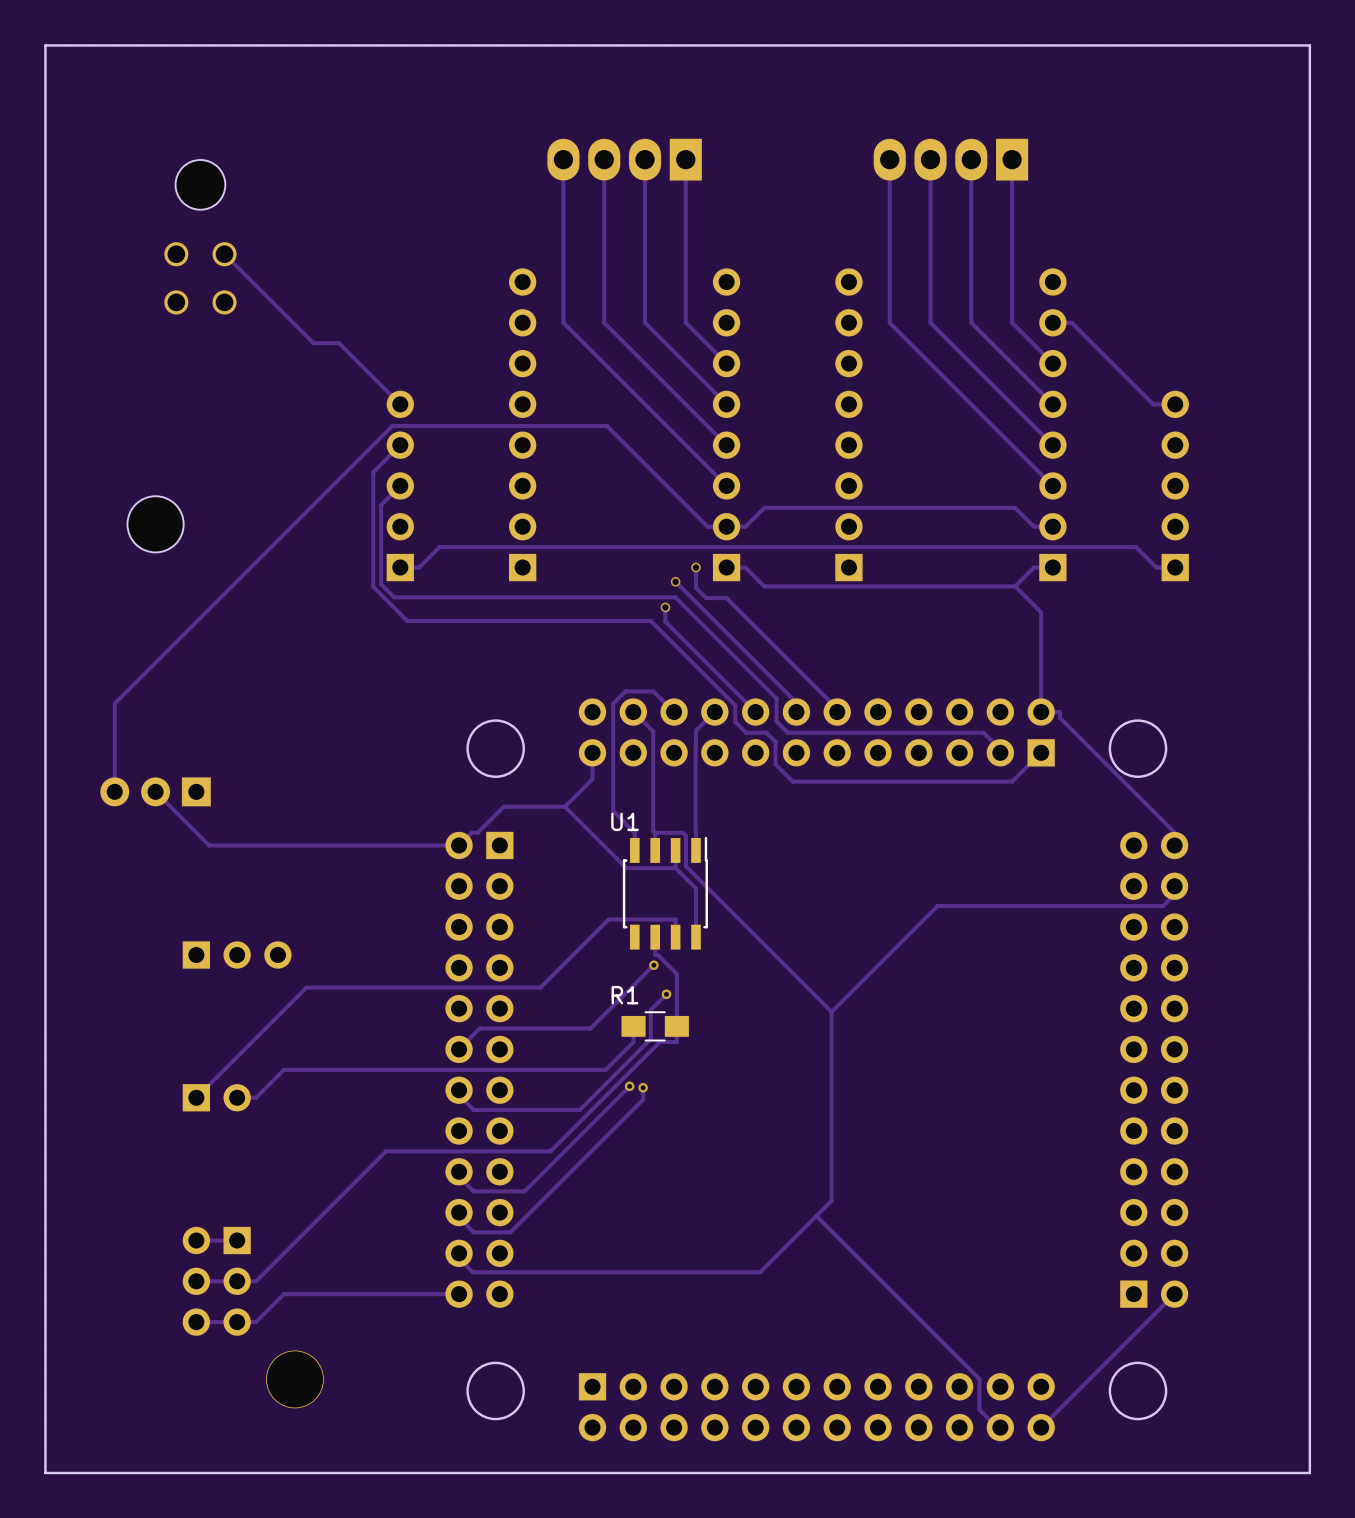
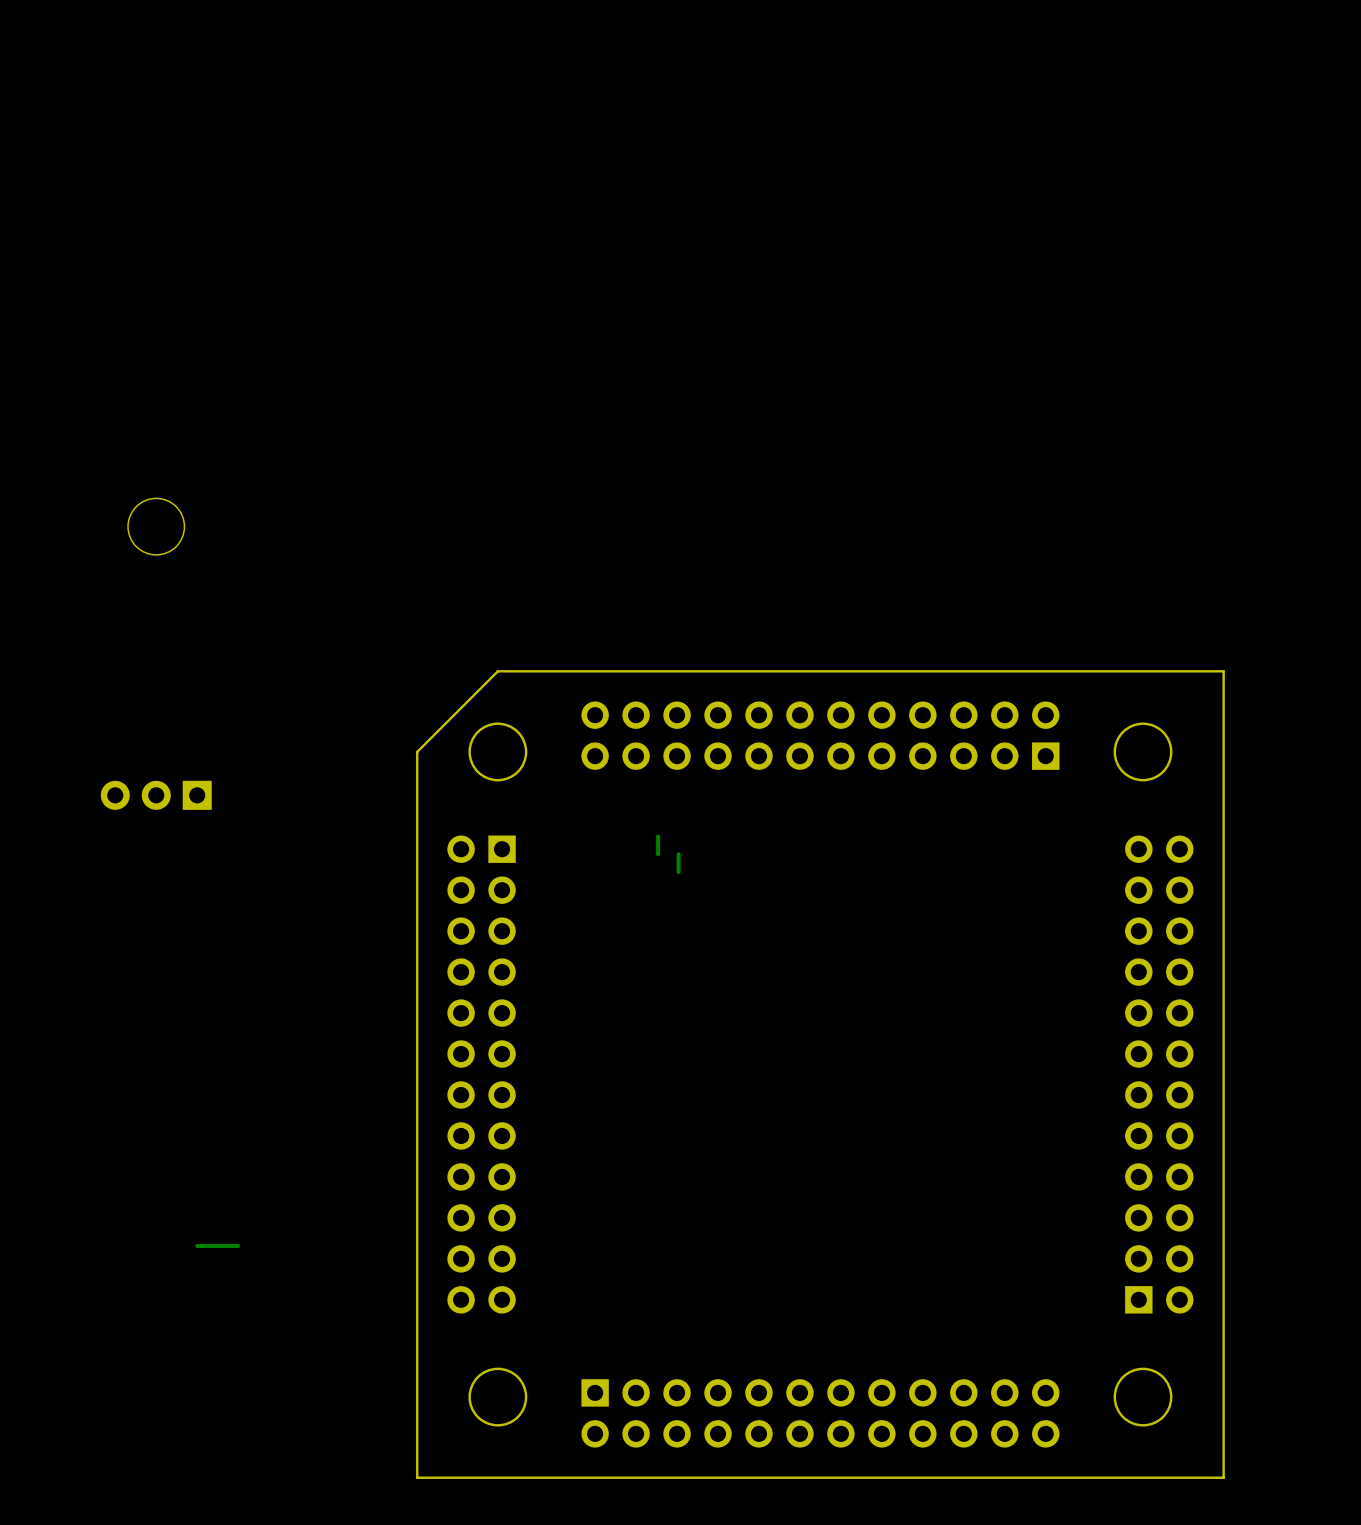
board edge: (1309, 45) (45, 45) (45, 1473) (1309, 1473) (1309, 45) -> none
track: (563, 159) (563, 322) (726, 485) -> none
track: (604, 159) (604, 322) (726, 445) -> none
part: (624, 159) -> none
track: (645, 159) (645, 322) (726, 404) -> none
track: (685, 159) (685, 322) (726, 363) -> none
track: (889, 159) (889, 322) (1052, 485) -> none
track: (930, 159) (930, 322) (1052, 445) -> none
part: (950, 159) -> none
track: (971, 159) (971, 322) (1052, 404) -> none
track: (1012, 159) (1012, 322) (1052, 363) -> none
part: (200, 237) -> none
track: (224, 254) (313, 343) (339, 343) (400, 404) -> none
track: (1052, 322) (1071, 322) (1153, 404) (1175, 404) -> none
part: (522, 424) -> none
part: (726, 424) -> none
part: (848, 424) -> none
part: (1052, 424) -> none
track: (400, 445) (373, 472) (373, 586) (407, 620) (650, 620) (735, 705) (735, 722) (745, 732) (766, 732) (775, 741) (775, 764) (792, 781) (1012, 781) (1040, 752) -> none
track: (400, 485) (381, 505) (381, 584) (394, 597) (675, 597) (776, 698) (776, 721) (787, 732) (983, 732) (1000, 749) (1000, 752) -> none
part: (400, 485) -> none
part: (1175, 485) -> none
track: (1052, 526) (1034, 526) (1015, 507) (764, 507) (745, 526) (707, 526) (606, 425) (392, 425) (114, 703) (114, 791) -> none
track: (696, 567) (696, 587) (706, 598) (726, 598) (837, 708) (837, 712) -> none
via: (696, 567) -> none
track: (726, 567) (745, 567) (764, 586) (1015, 586) -> none
track: (1052, 567) (1034, 567) (1015, 586) -> none
track: (1175, 567) (1156, 567) (1135, 547) (439, 547) (419, 567) (400, 567) -> none
track: (675, 581) (795, 702) (796, 712) -> none
via: (675, 581) -> none
track: (1015, 586) (1041, 612) (1041, 712) (1060, 712) (1060, 717) (1174, 832) (1174, 845) -> none
track: (665, 607) (665, 621) (755, 712) -> none
via: (665, 607) -> none
board edge: none -> (1223, 671) (1223, 1477) (417, 1477) (417, 751) (497, 671) (1223, 671)
track: (633, 712) (653, 731) (653, 830) (655, 832) (682, 832) (685, 836) (685, 866) (831, 1011) -> none
track: (674, 712) (653, 691) (625, 691) (613, 703) (613, 811) (634, 832) (634, 850) -> none
track: (714, 712) (696, 730) (696, 850) -> none
track: (592, 752) (592, 779) (565, 806) -> none
track: (155, 791) (209, 845) (459, 845) -> none
track: (565, 806) (503, 806) (477, 832) (471, 832) (459, 845) -> none
track: (565, 806) (626, 868) (675, 868) (696, 888) (696, 937) -> none
track: (1174, 886) (1174, 894) (1163, 906) (937, 906) (831, 1011) -> none
U1: (665, 893) -> none
track: (655, 937) (655, 954) (657, 954) (676, 974) (676, 1042) (659, 1042) (550, 1151) (385, 1151) (256, 1281) (196, 1281) -> none
track: (675, 937) (675, 919) (608, 919) (540, 987) (306, 987) (196, 1097) -> none
part: (237, 955) -> none
track: (653, 965) (590, 1028) (479, 1028) (459, 1049) -> none
via: (653, 965) -> none
track: (666, 994) (650, 1009) (650, 1038) (579, 1109) (473, 1109) (459, 1095) (459, 1090) -> none
via: (666, 994) -> none
track: (831, 1011) (831, 1200) (760, 1272) (472, 1272) (459, 1258) (459, 1253) -> none
track: (633, 1026) (633, 1042) (605, 1069) (283, 1069) (256, 1097) (237, 1097) -> none
R1: (655, 1026) -> none
track: (629, 1086) (524, 1191) (473, 1191) (459, 1176) (459, 1171) -> none
via: (629, 1086) -> none
track: (643, 1087) (643, 1099) (510, 1232) (473, 1232) (459, 1217) (459, 1212) -> none
via: (643, 1087) -> none
part: (216, 1097) -> none
track: (816, 1216) (979, 1379) (979, 1409) (997, 1427) (1000, 1427) -> none
track: (459, 1294) (283, 1294) (256, 1322) (196, 1322) -> none
track: (1174, 1294) (1041, 1427) -> none
part: (253, 1317) -> none

